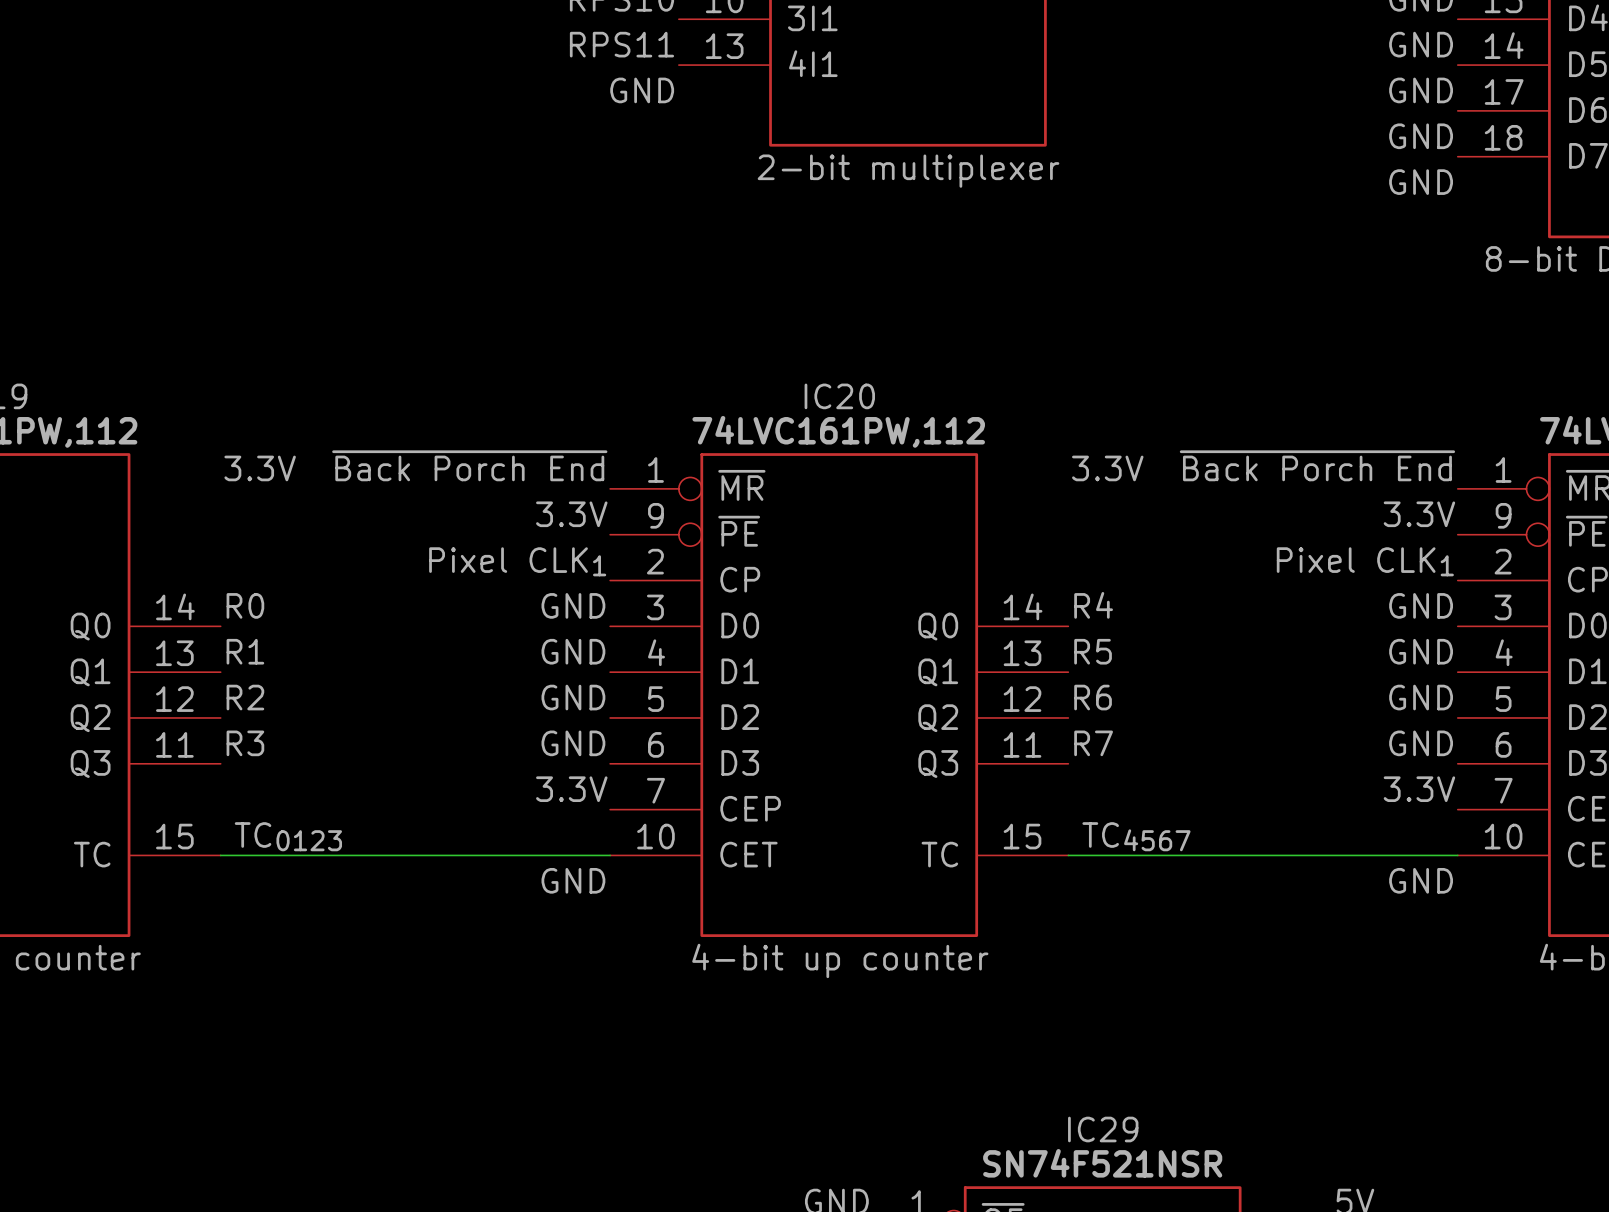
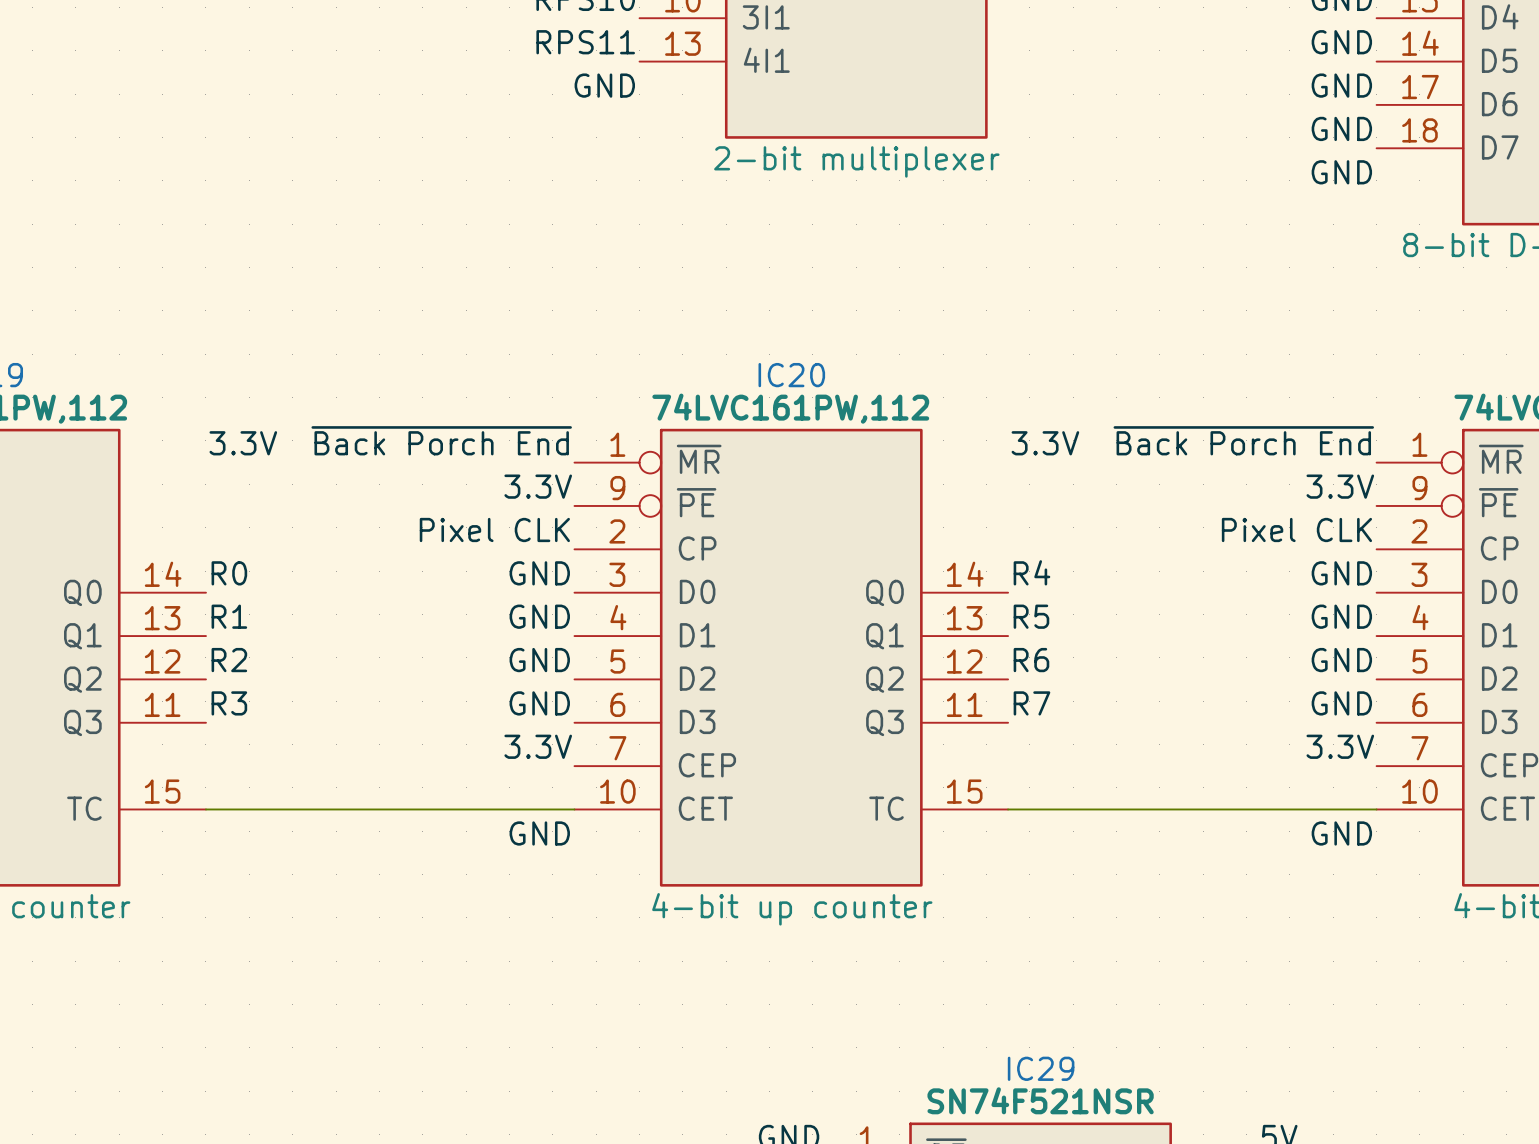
label: Pixel CLK1 (517, 561) -> Pixel CLK (494, 529)
label: Pixel CLK1 (1365, 561) -> Pixel CLK (1296, 529)
label: TC0123 (288, 836) -> none
label: TC4567 (1136, 836) -> none

